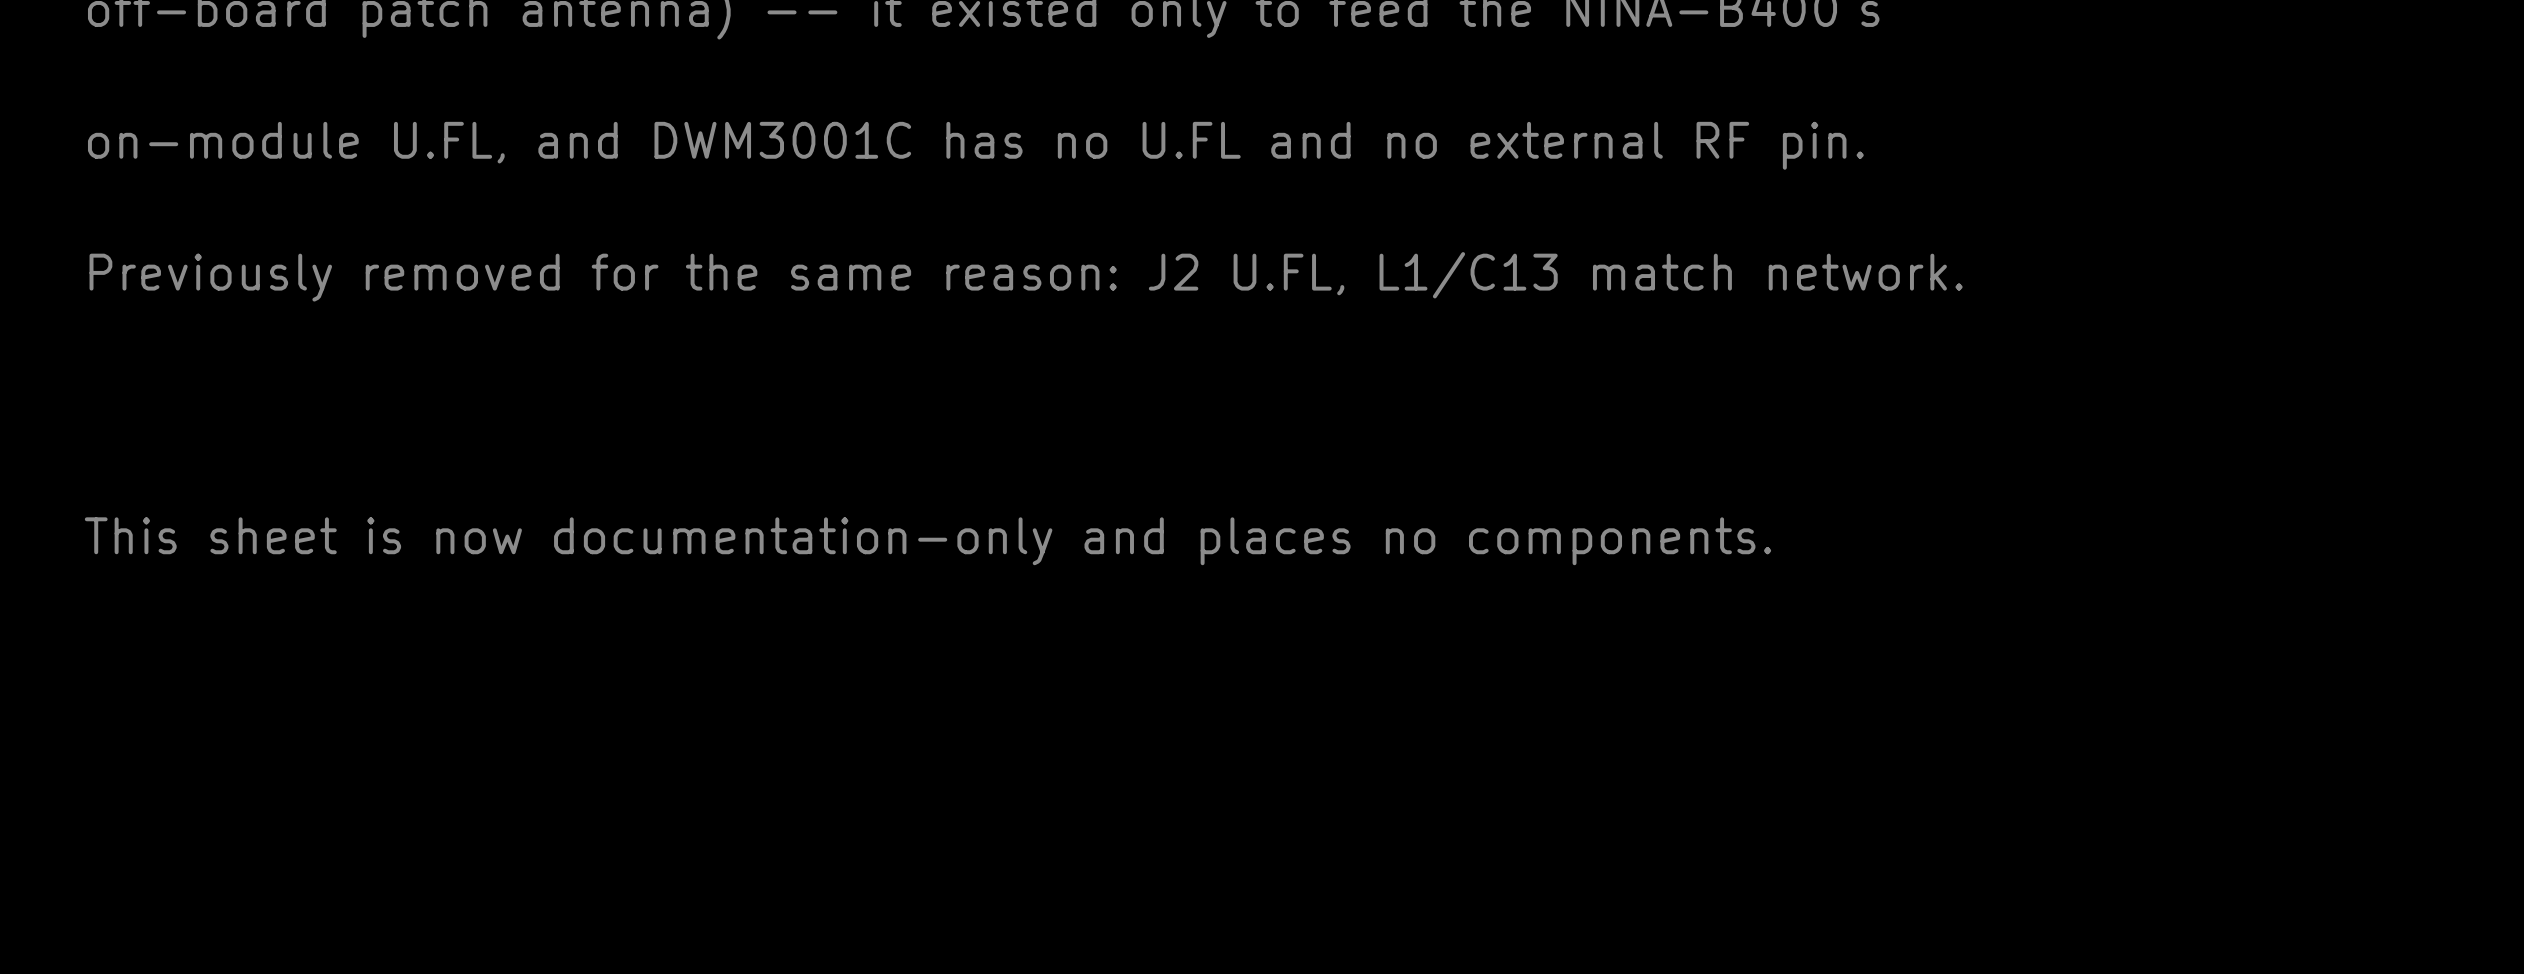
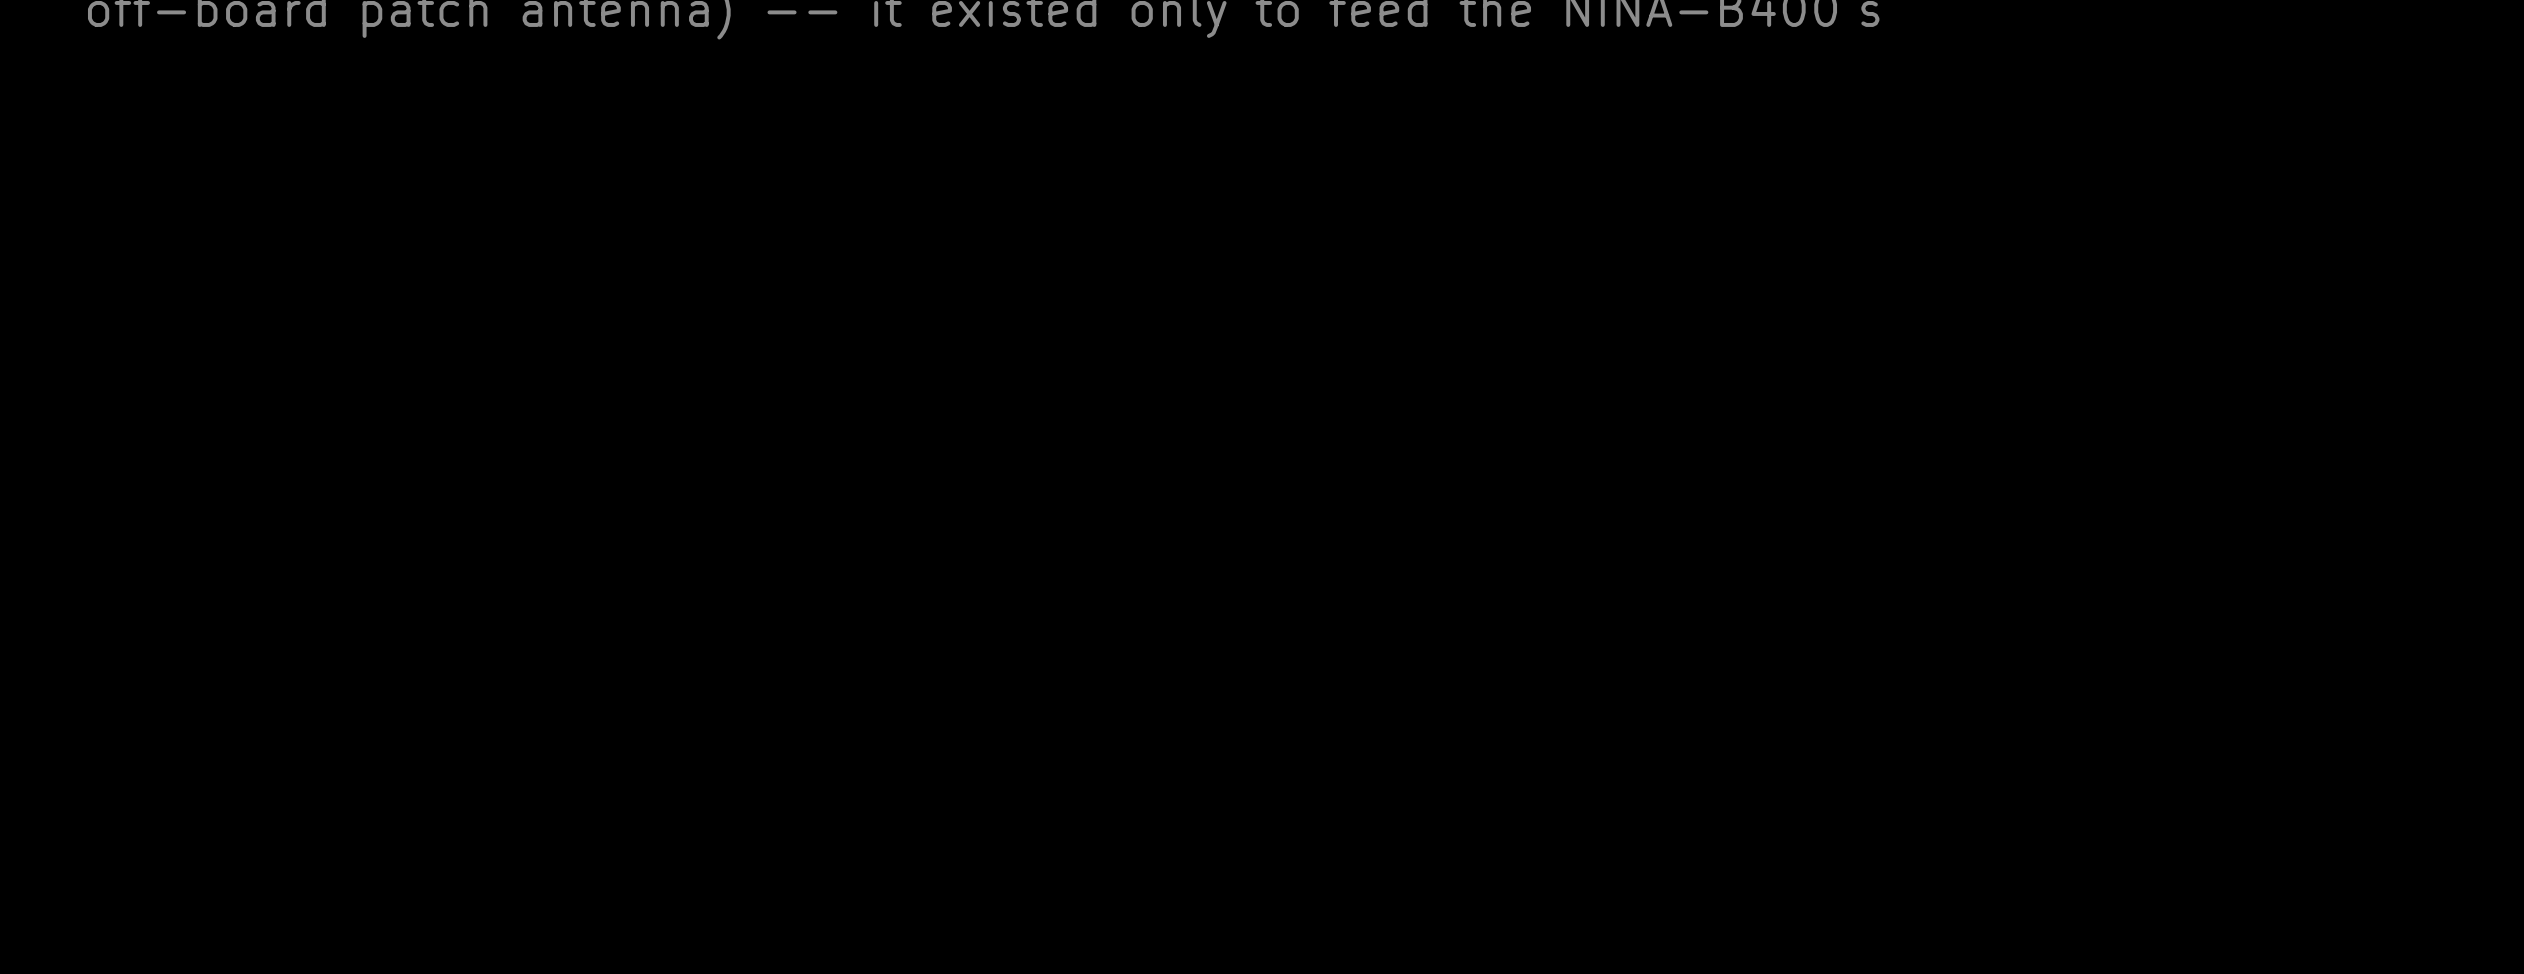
text: on-module U.FL, and DWM3001C has no U.FL and no external RF pin. (975, 145) -> none
text: Previously removed for the same reason: J2 U.FL, L1/C13 match network. (1026, 276) -> none
text: This sheet is now documentation-only and places no components. (927, 541) -> none

